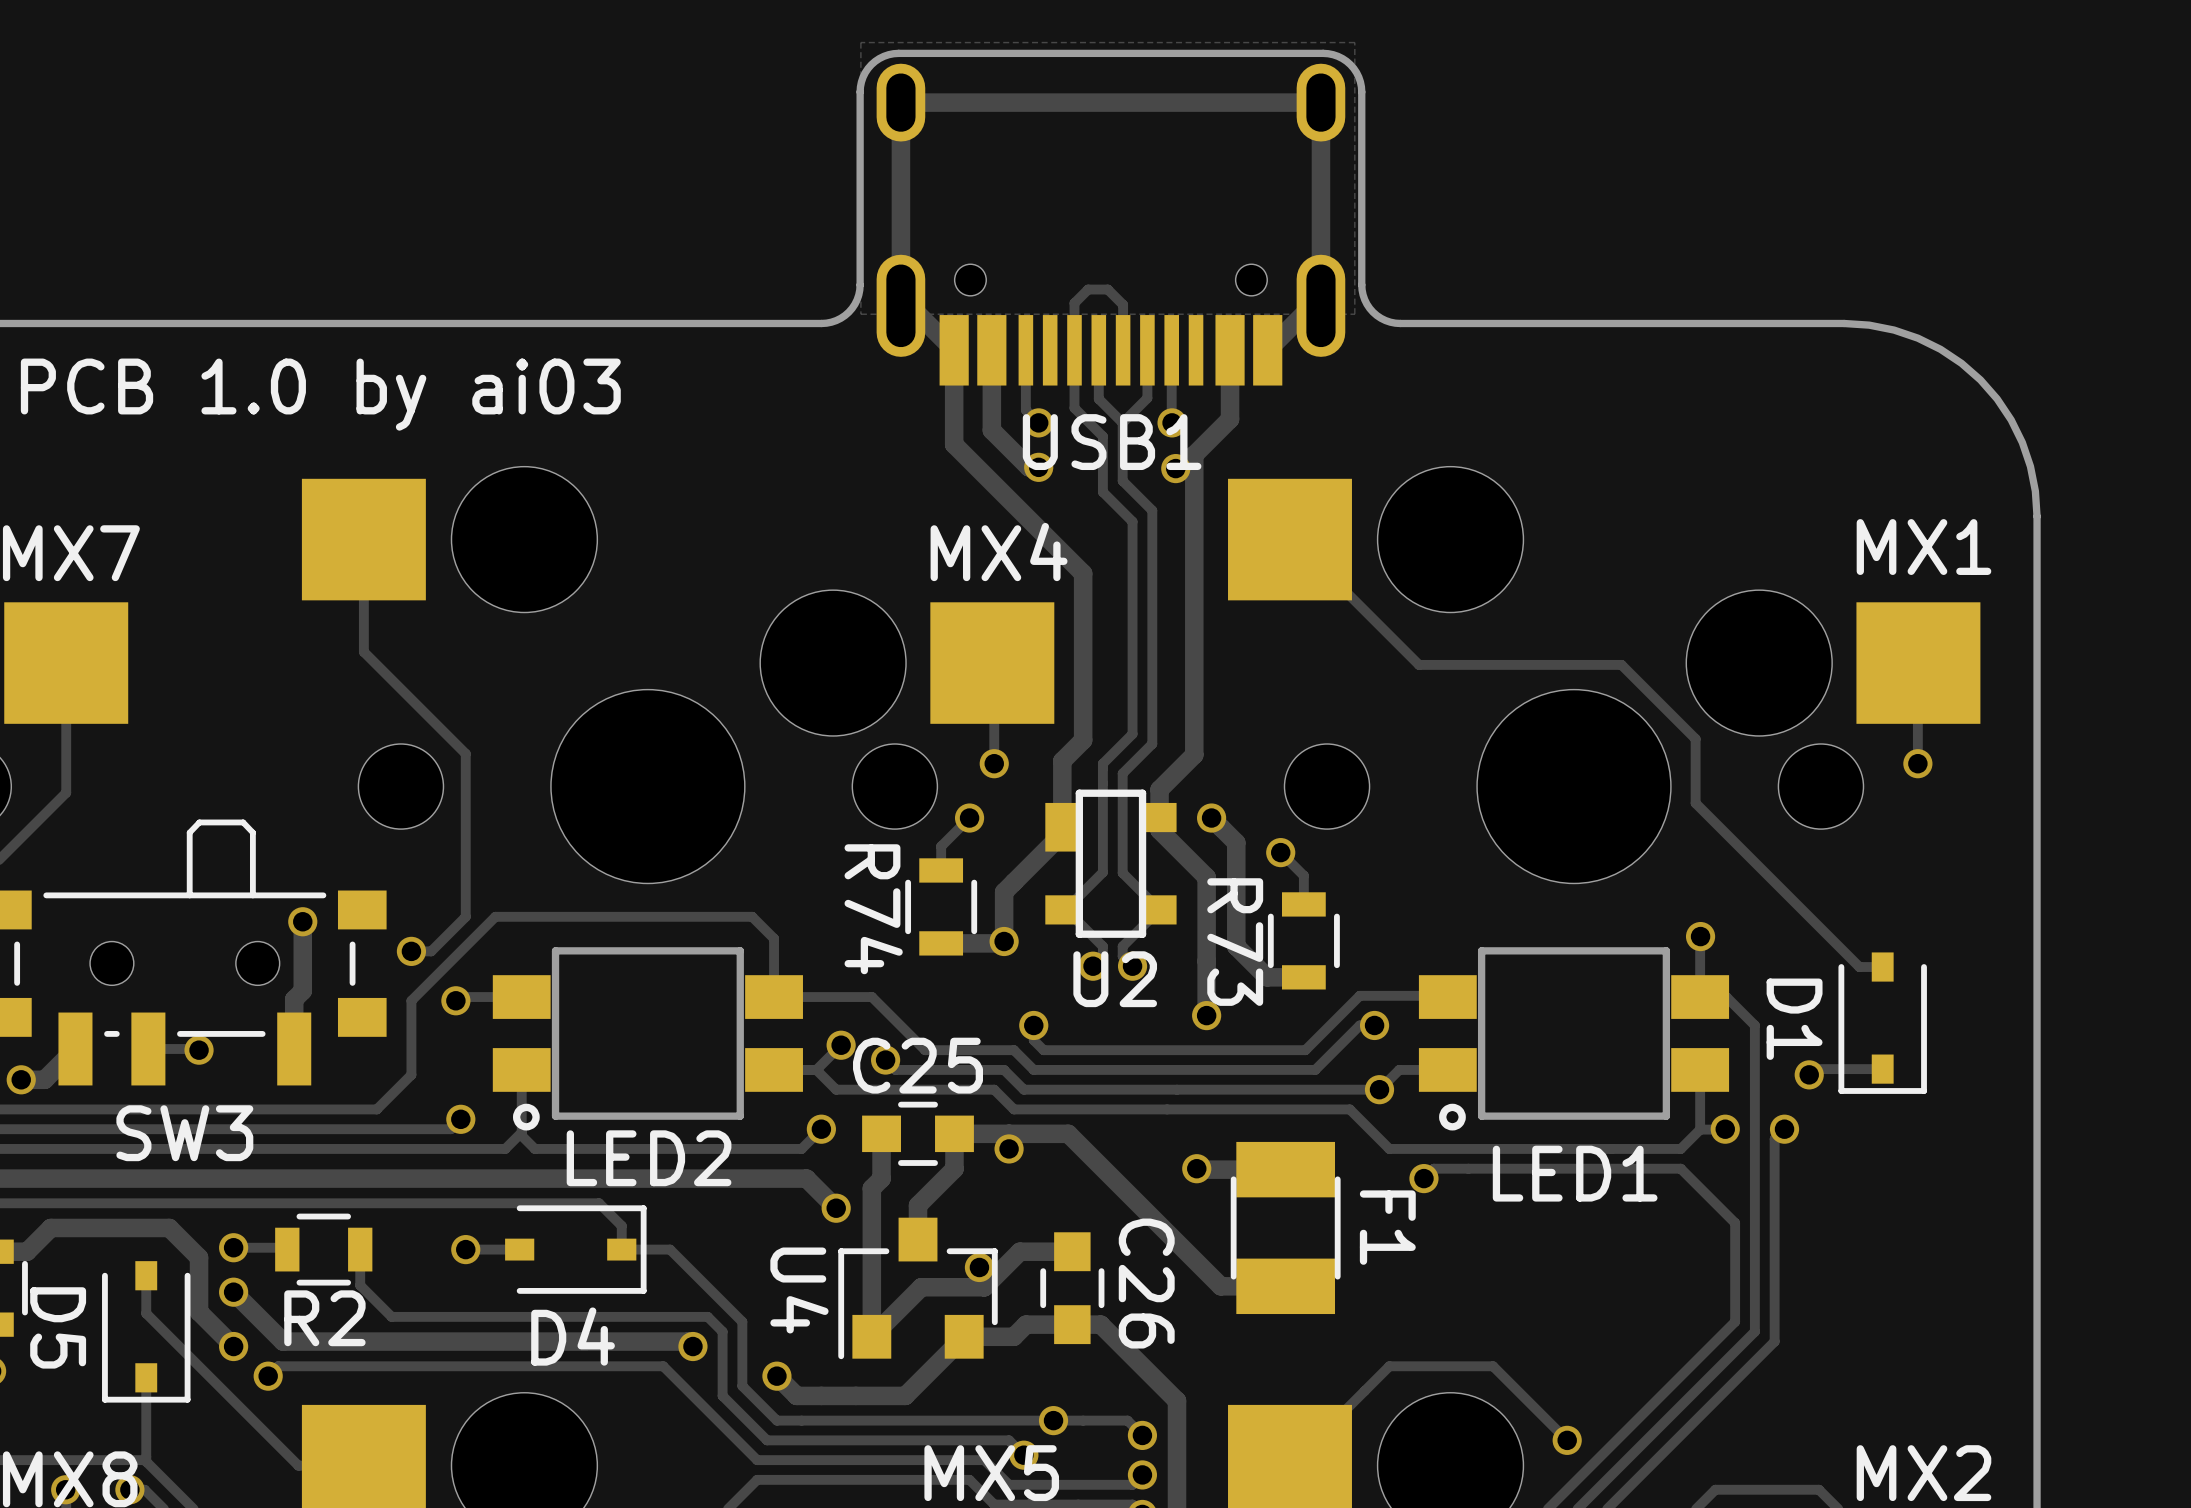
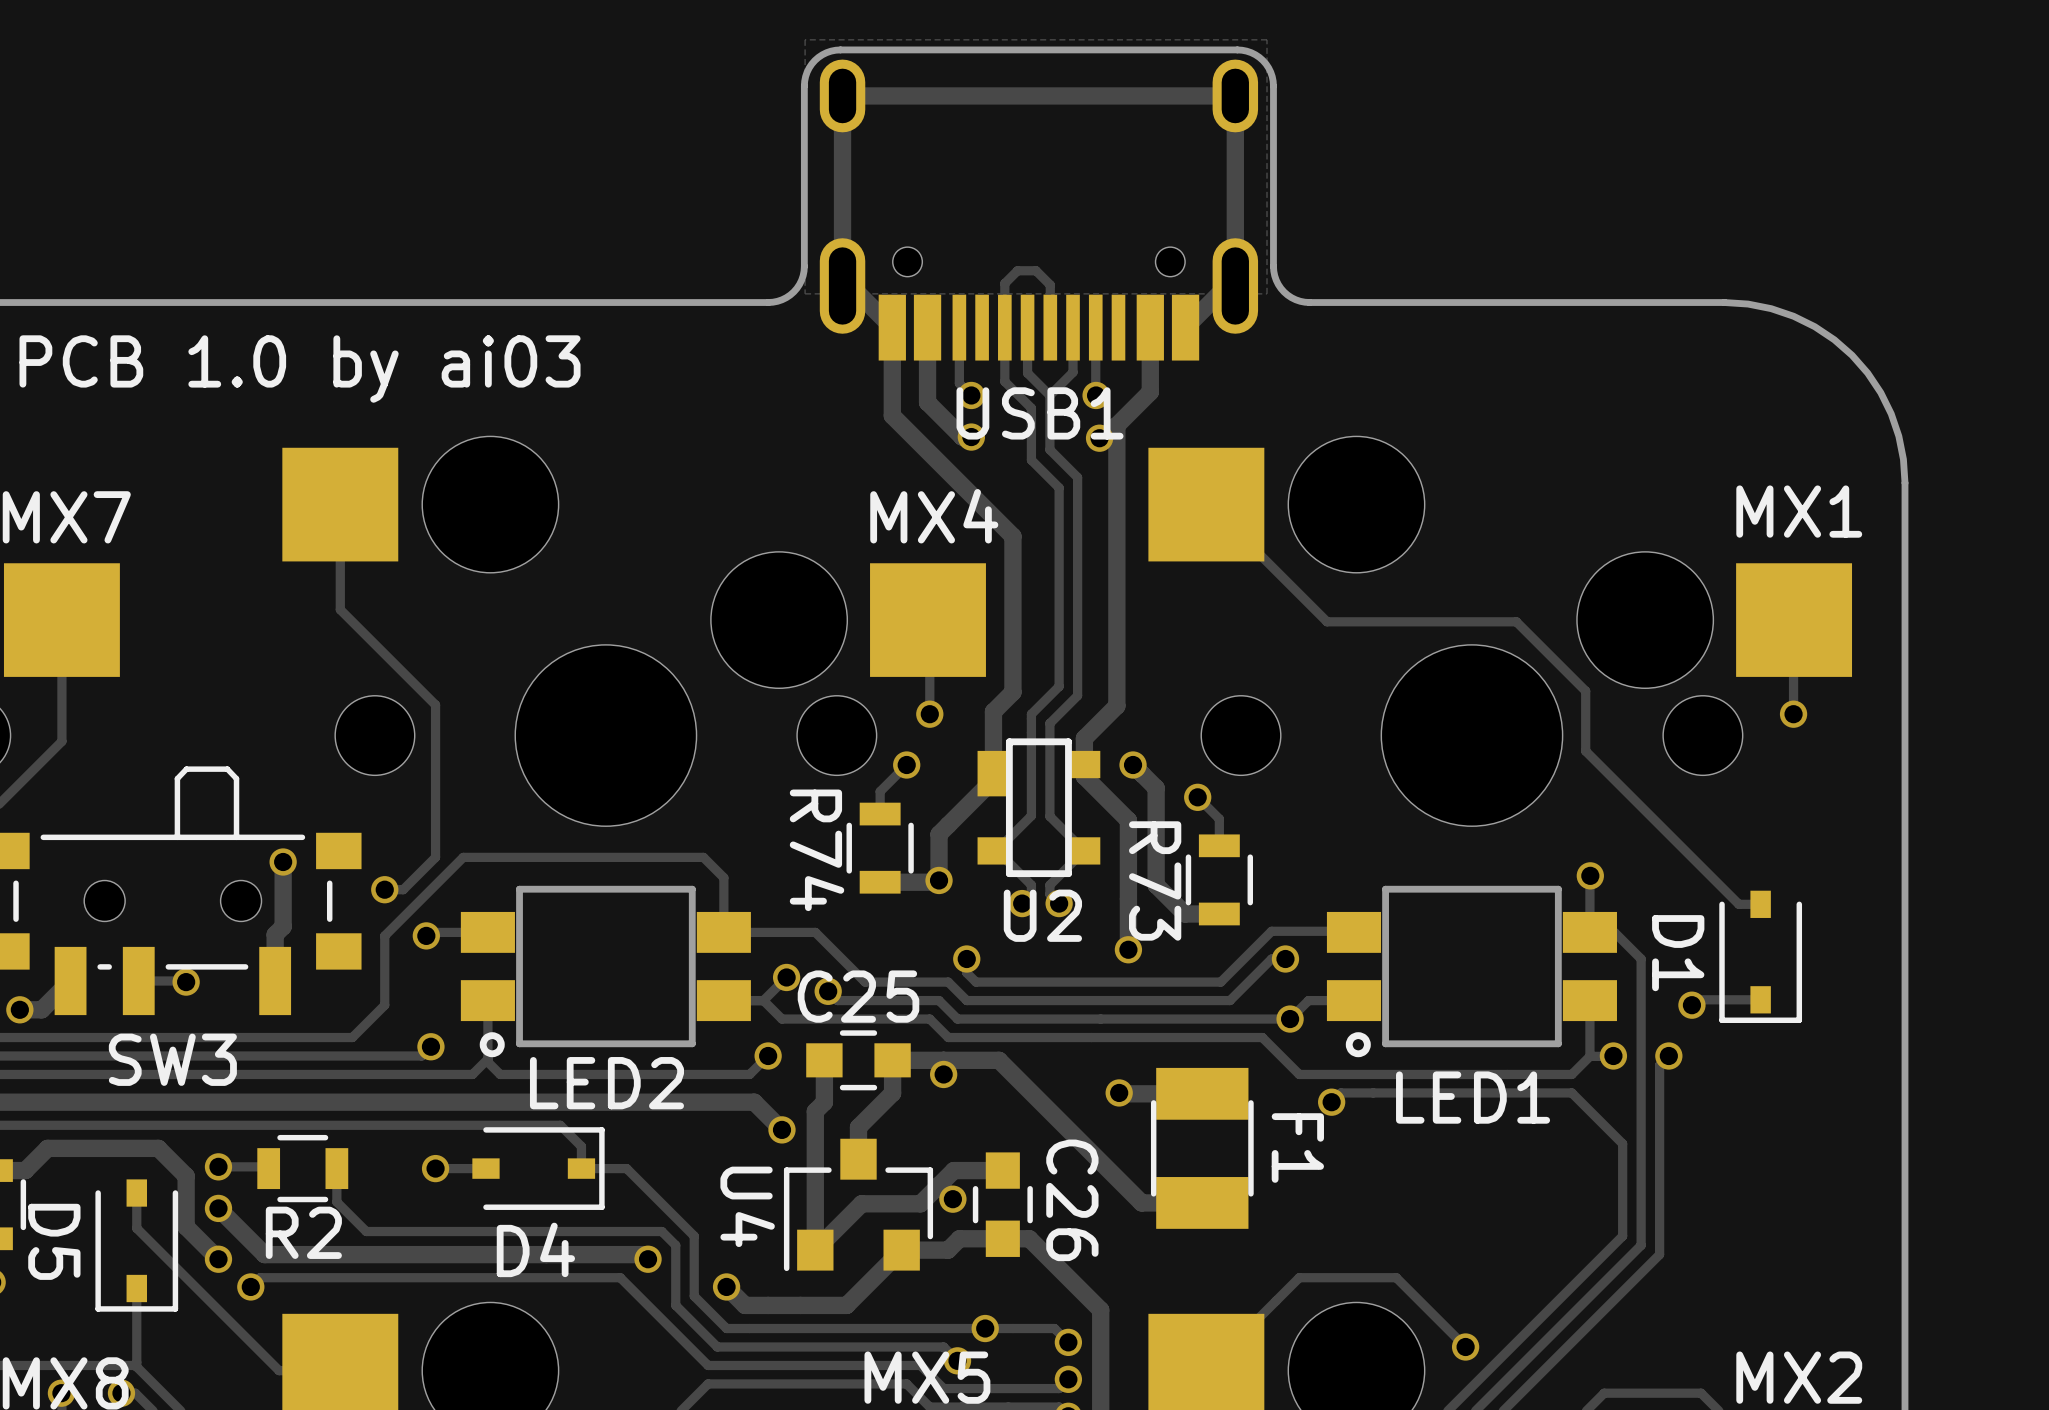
via position: (979, 1267) -> (952, 1199)

